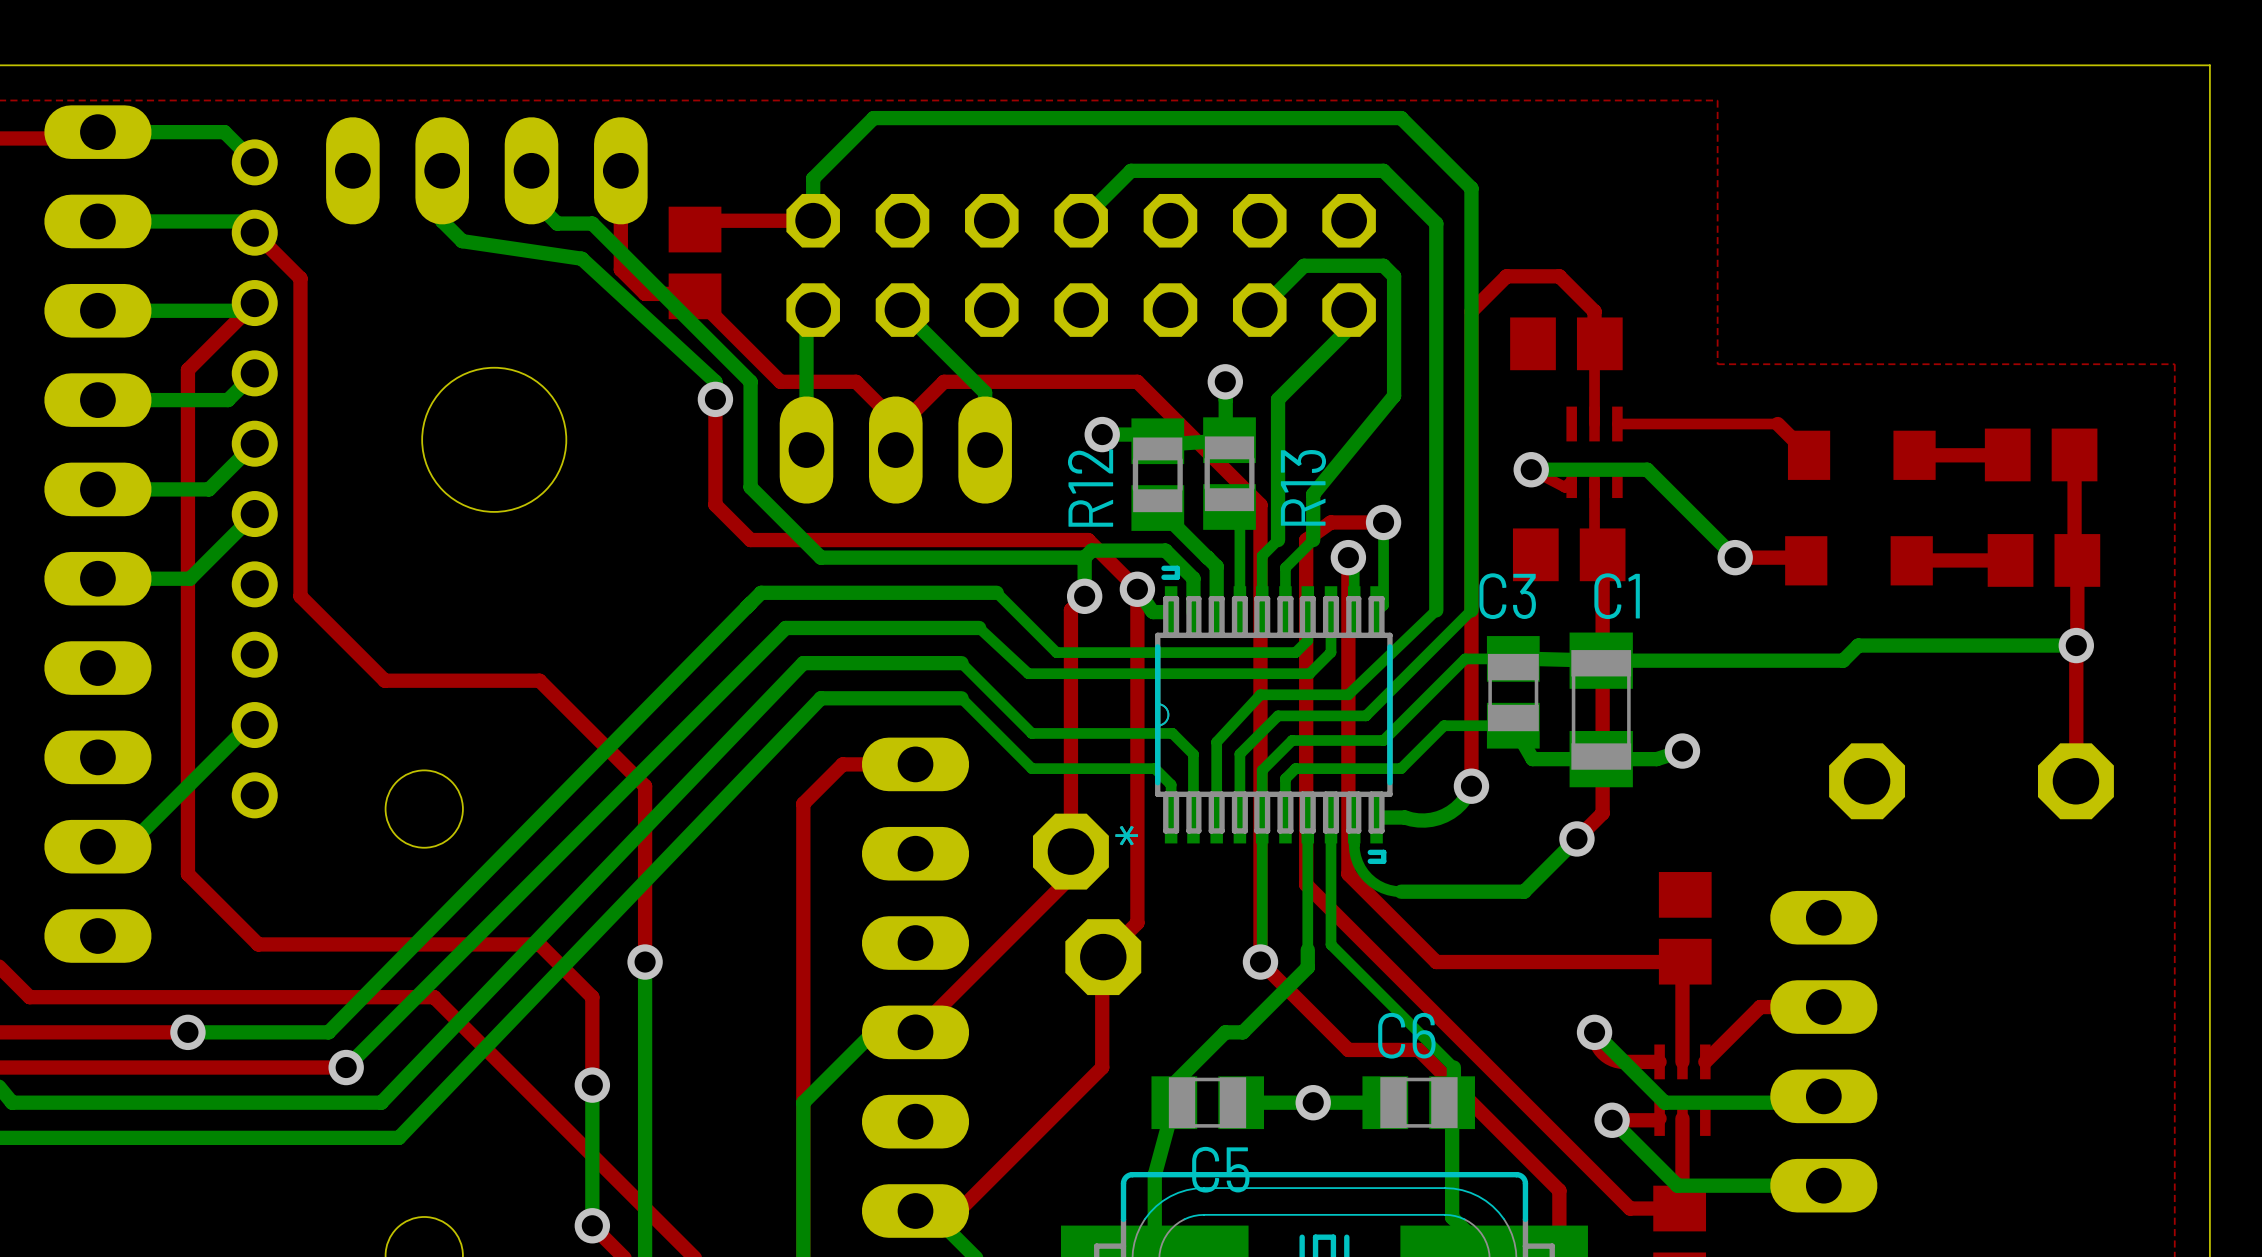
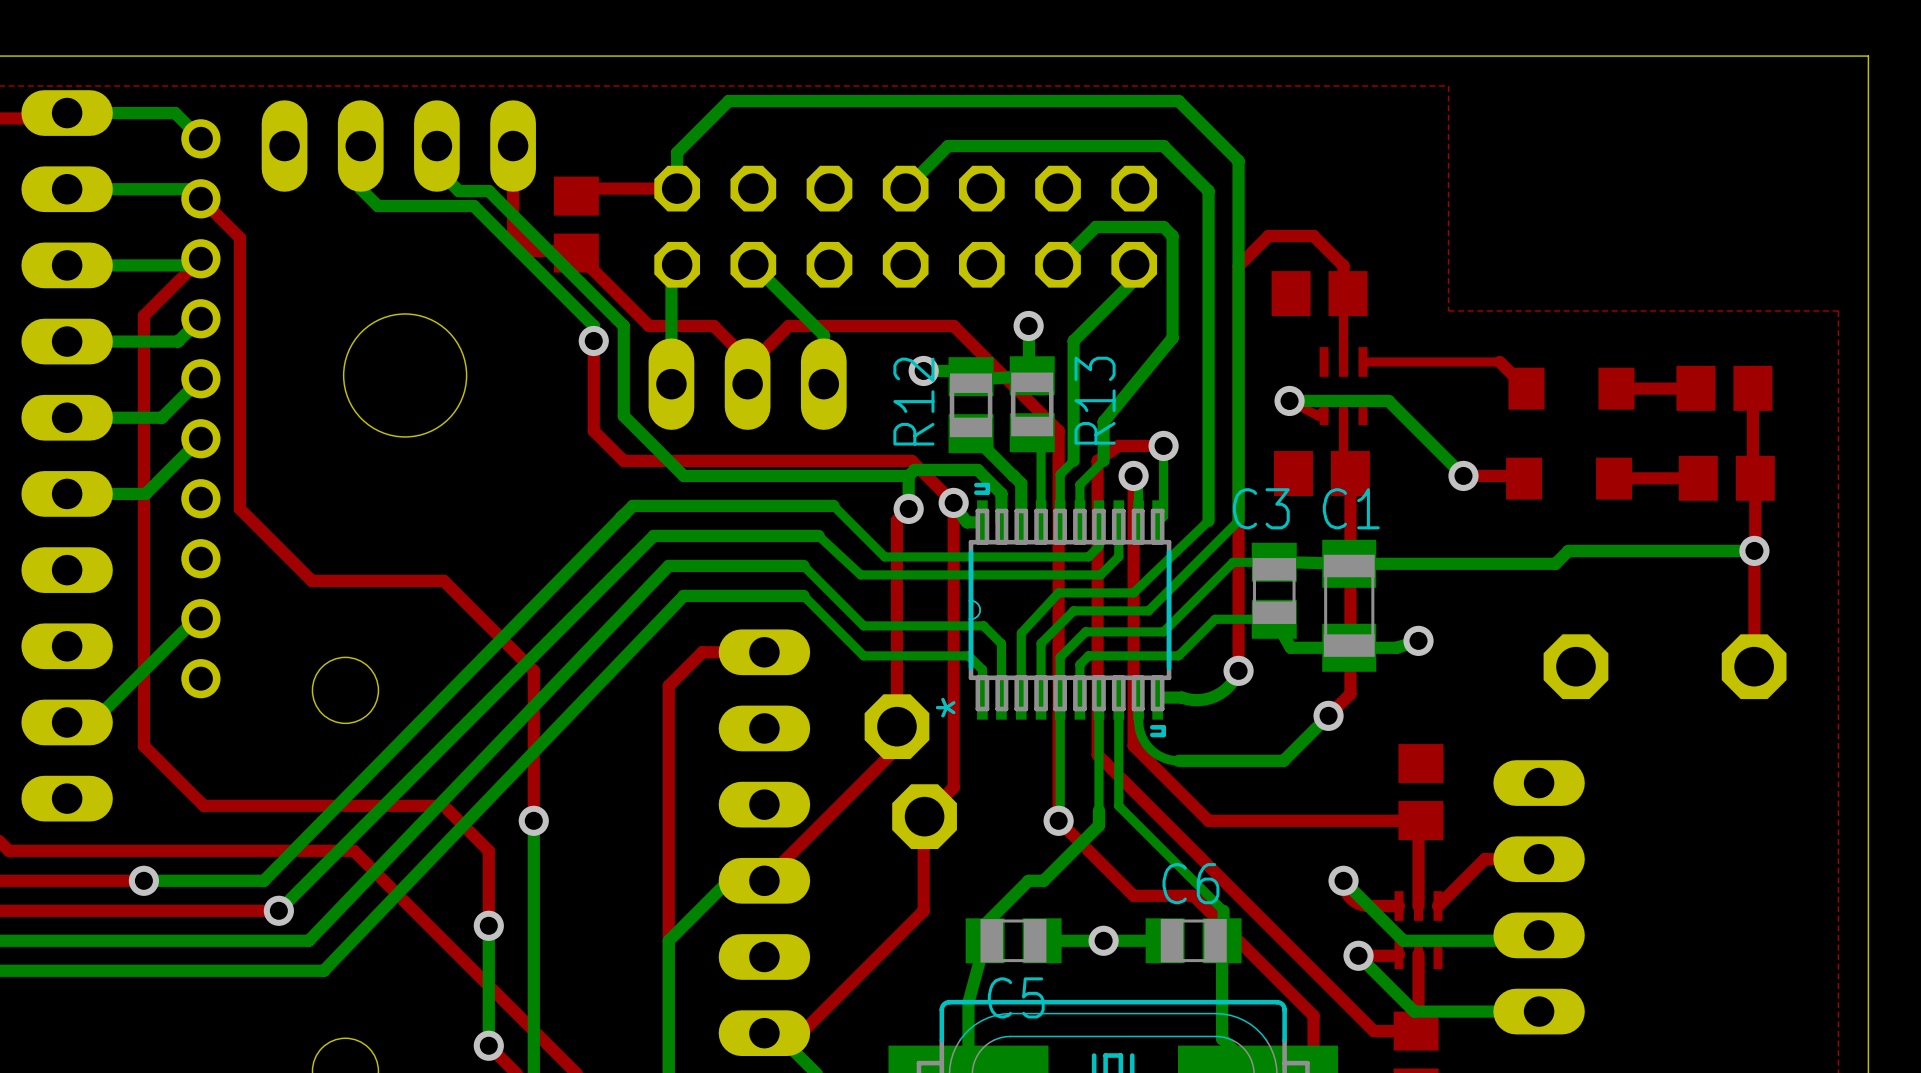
bottom track: (462, 241) (581, 258) (715, 381) -> (377, 206) (473, 206) (593, 325)

